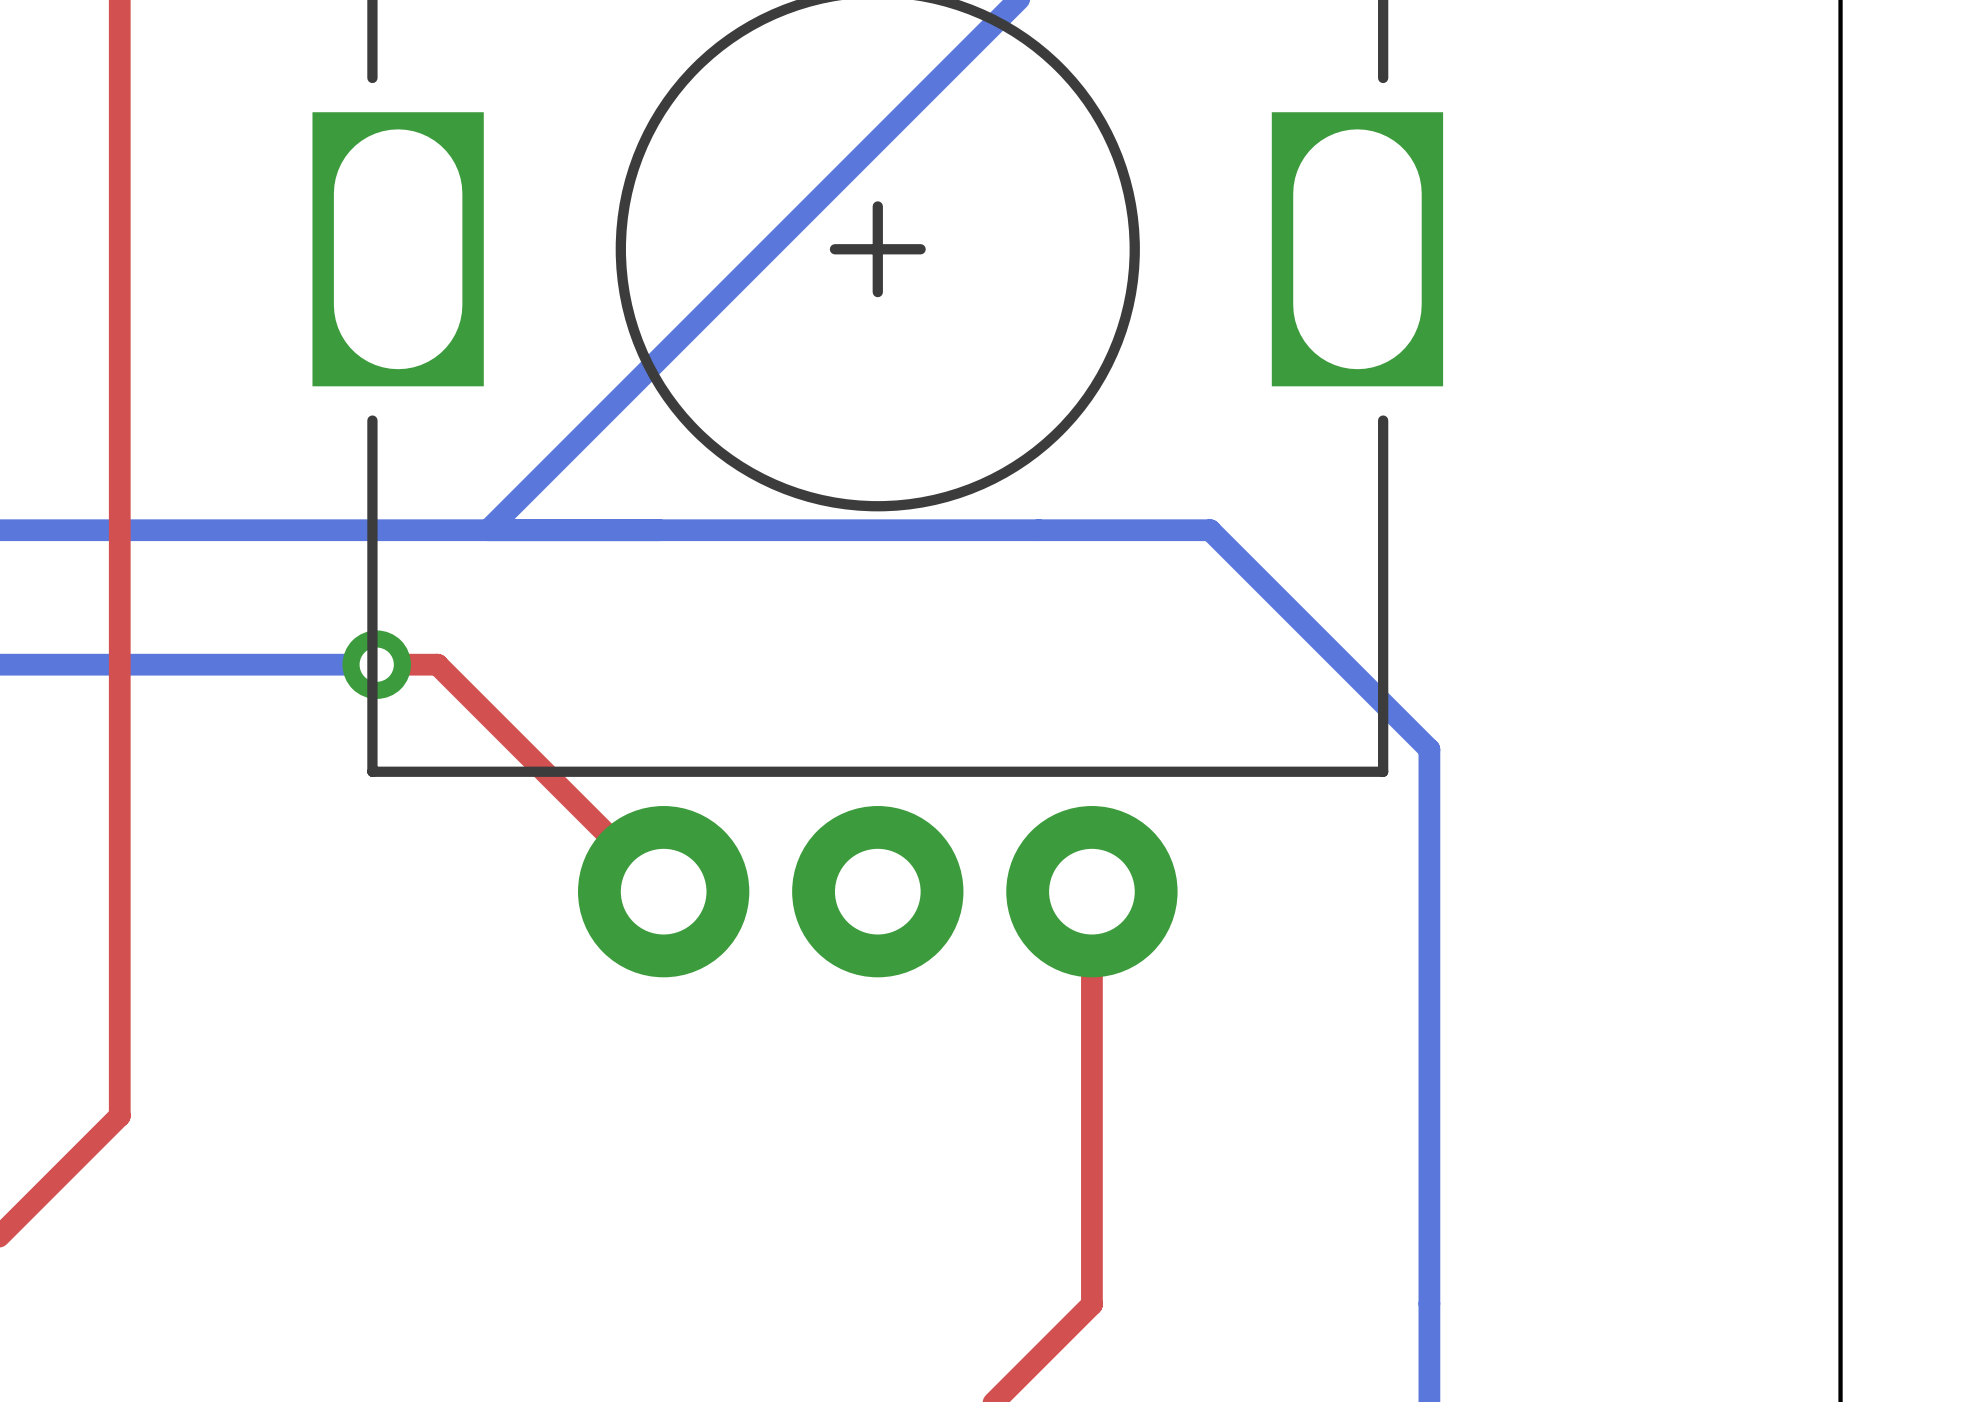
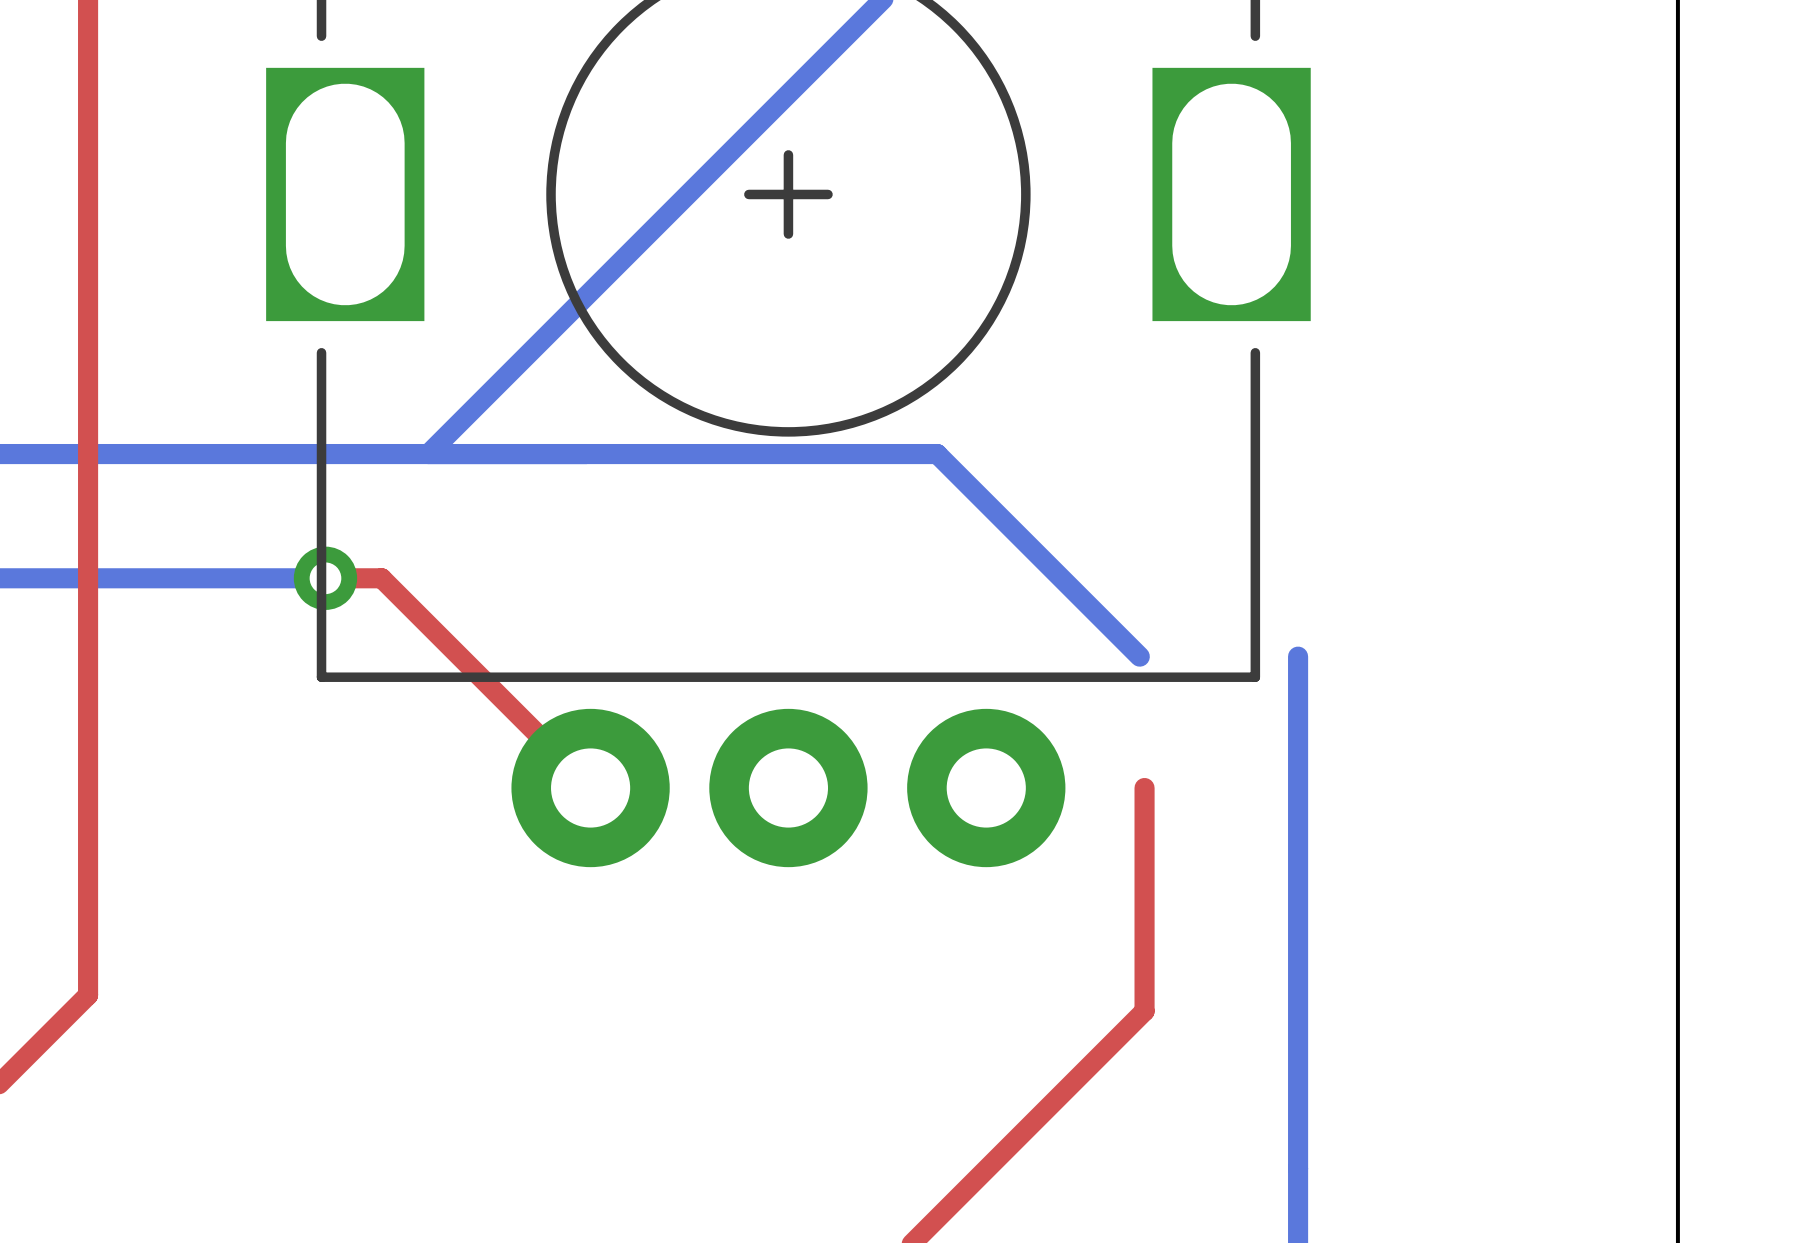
bottom track: (1038, 530) (1210, 530) (1429, 749) -> (937, 454) (1139, 656)
top track: (1091, 891) (1091, 1304) -> (1144, 788) (1144, 1011) (986, 1169)

